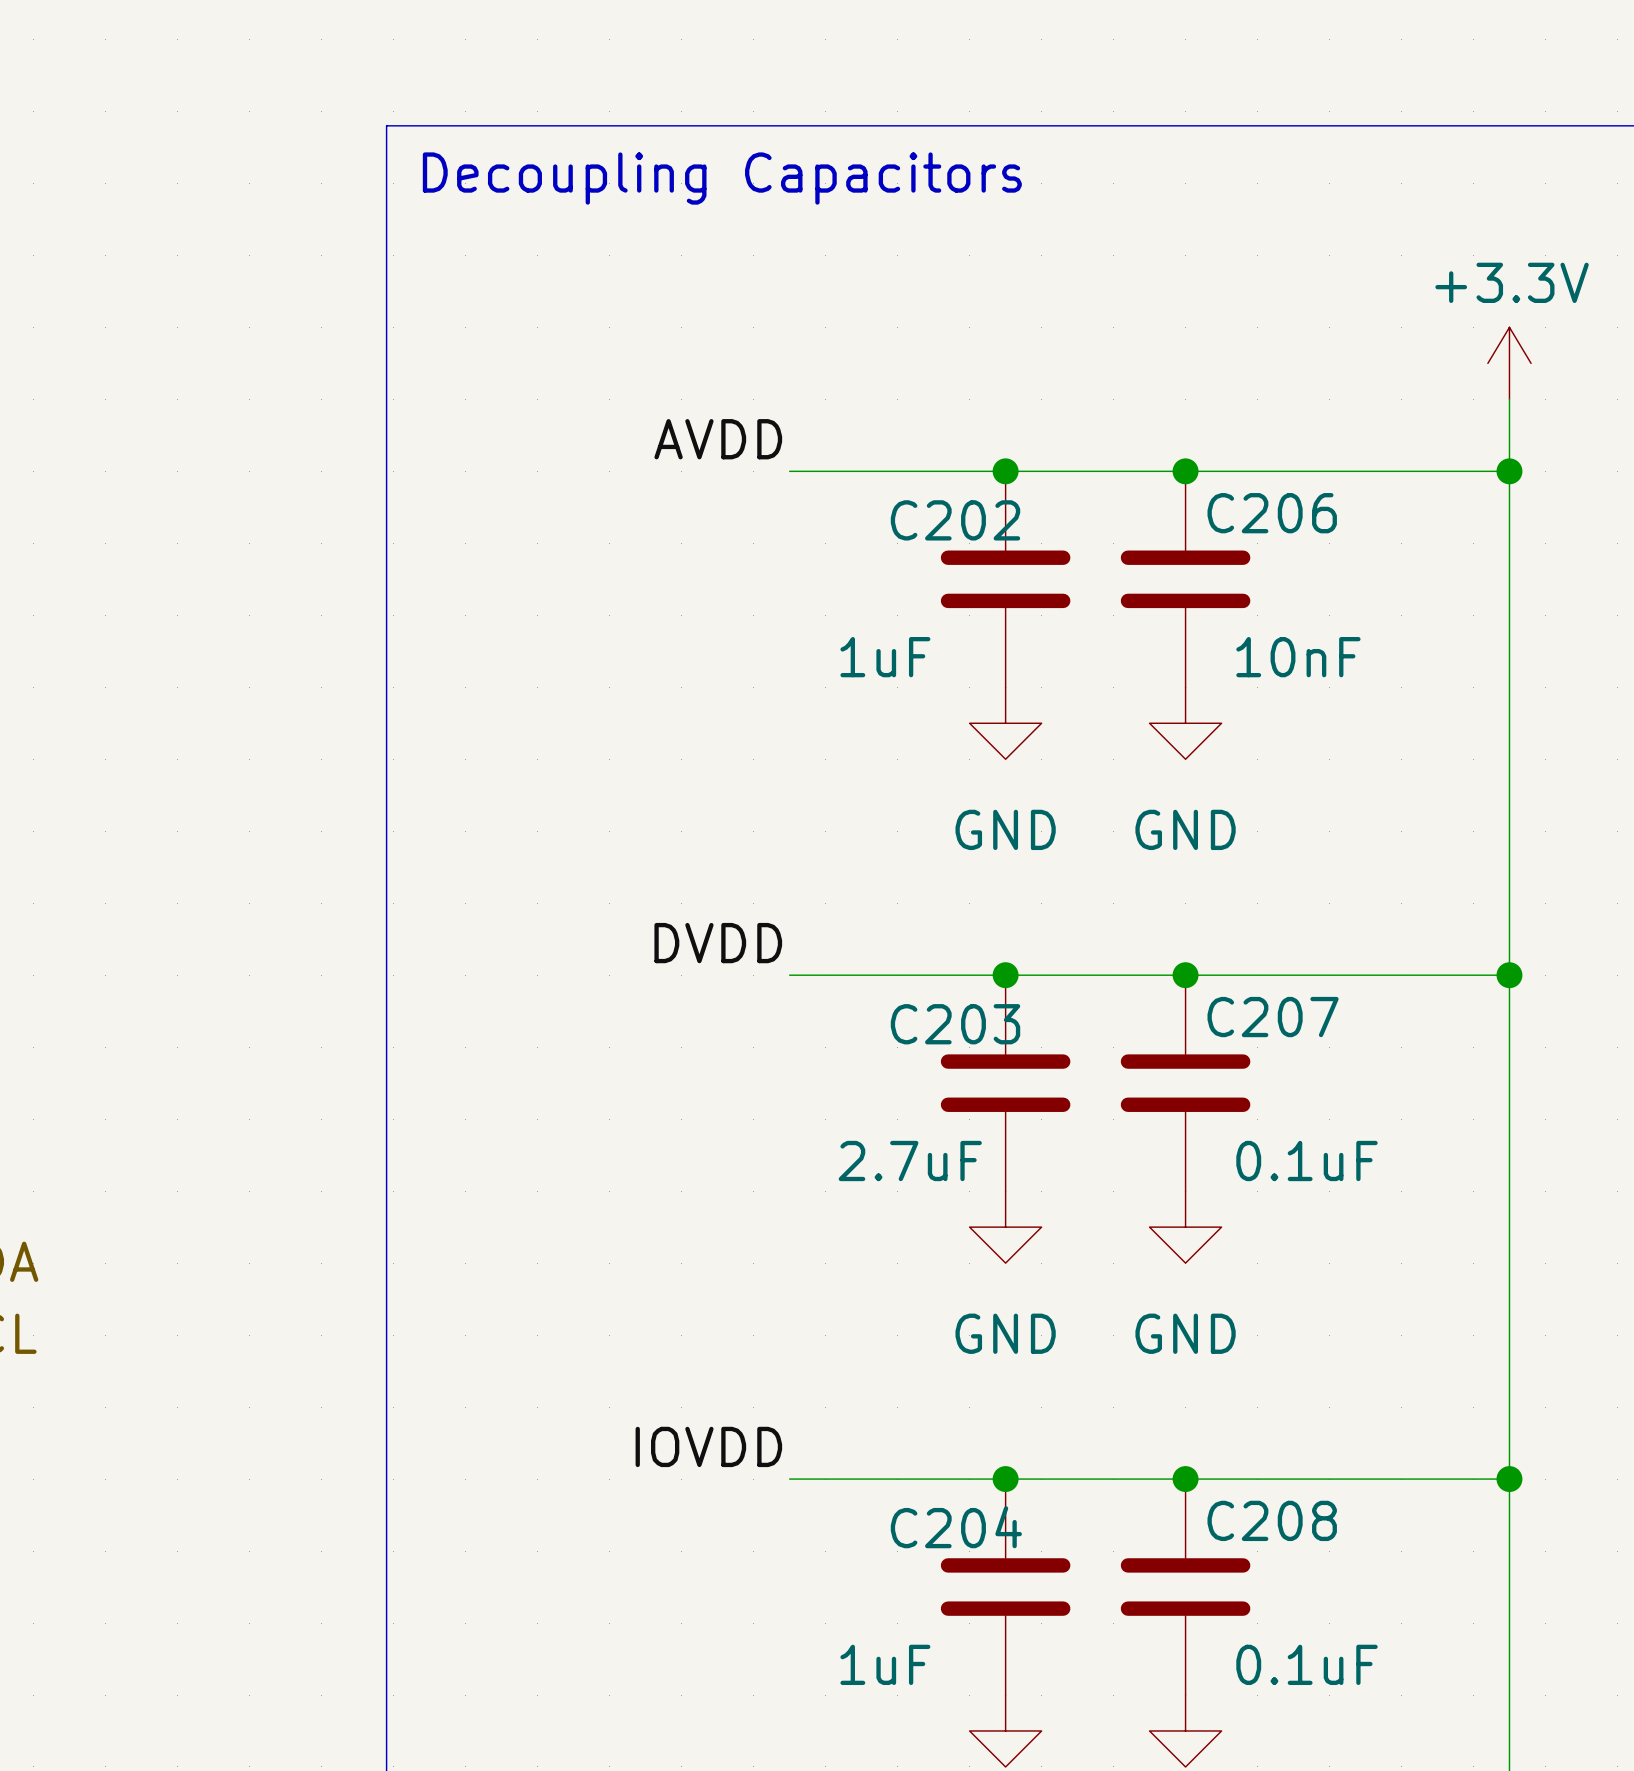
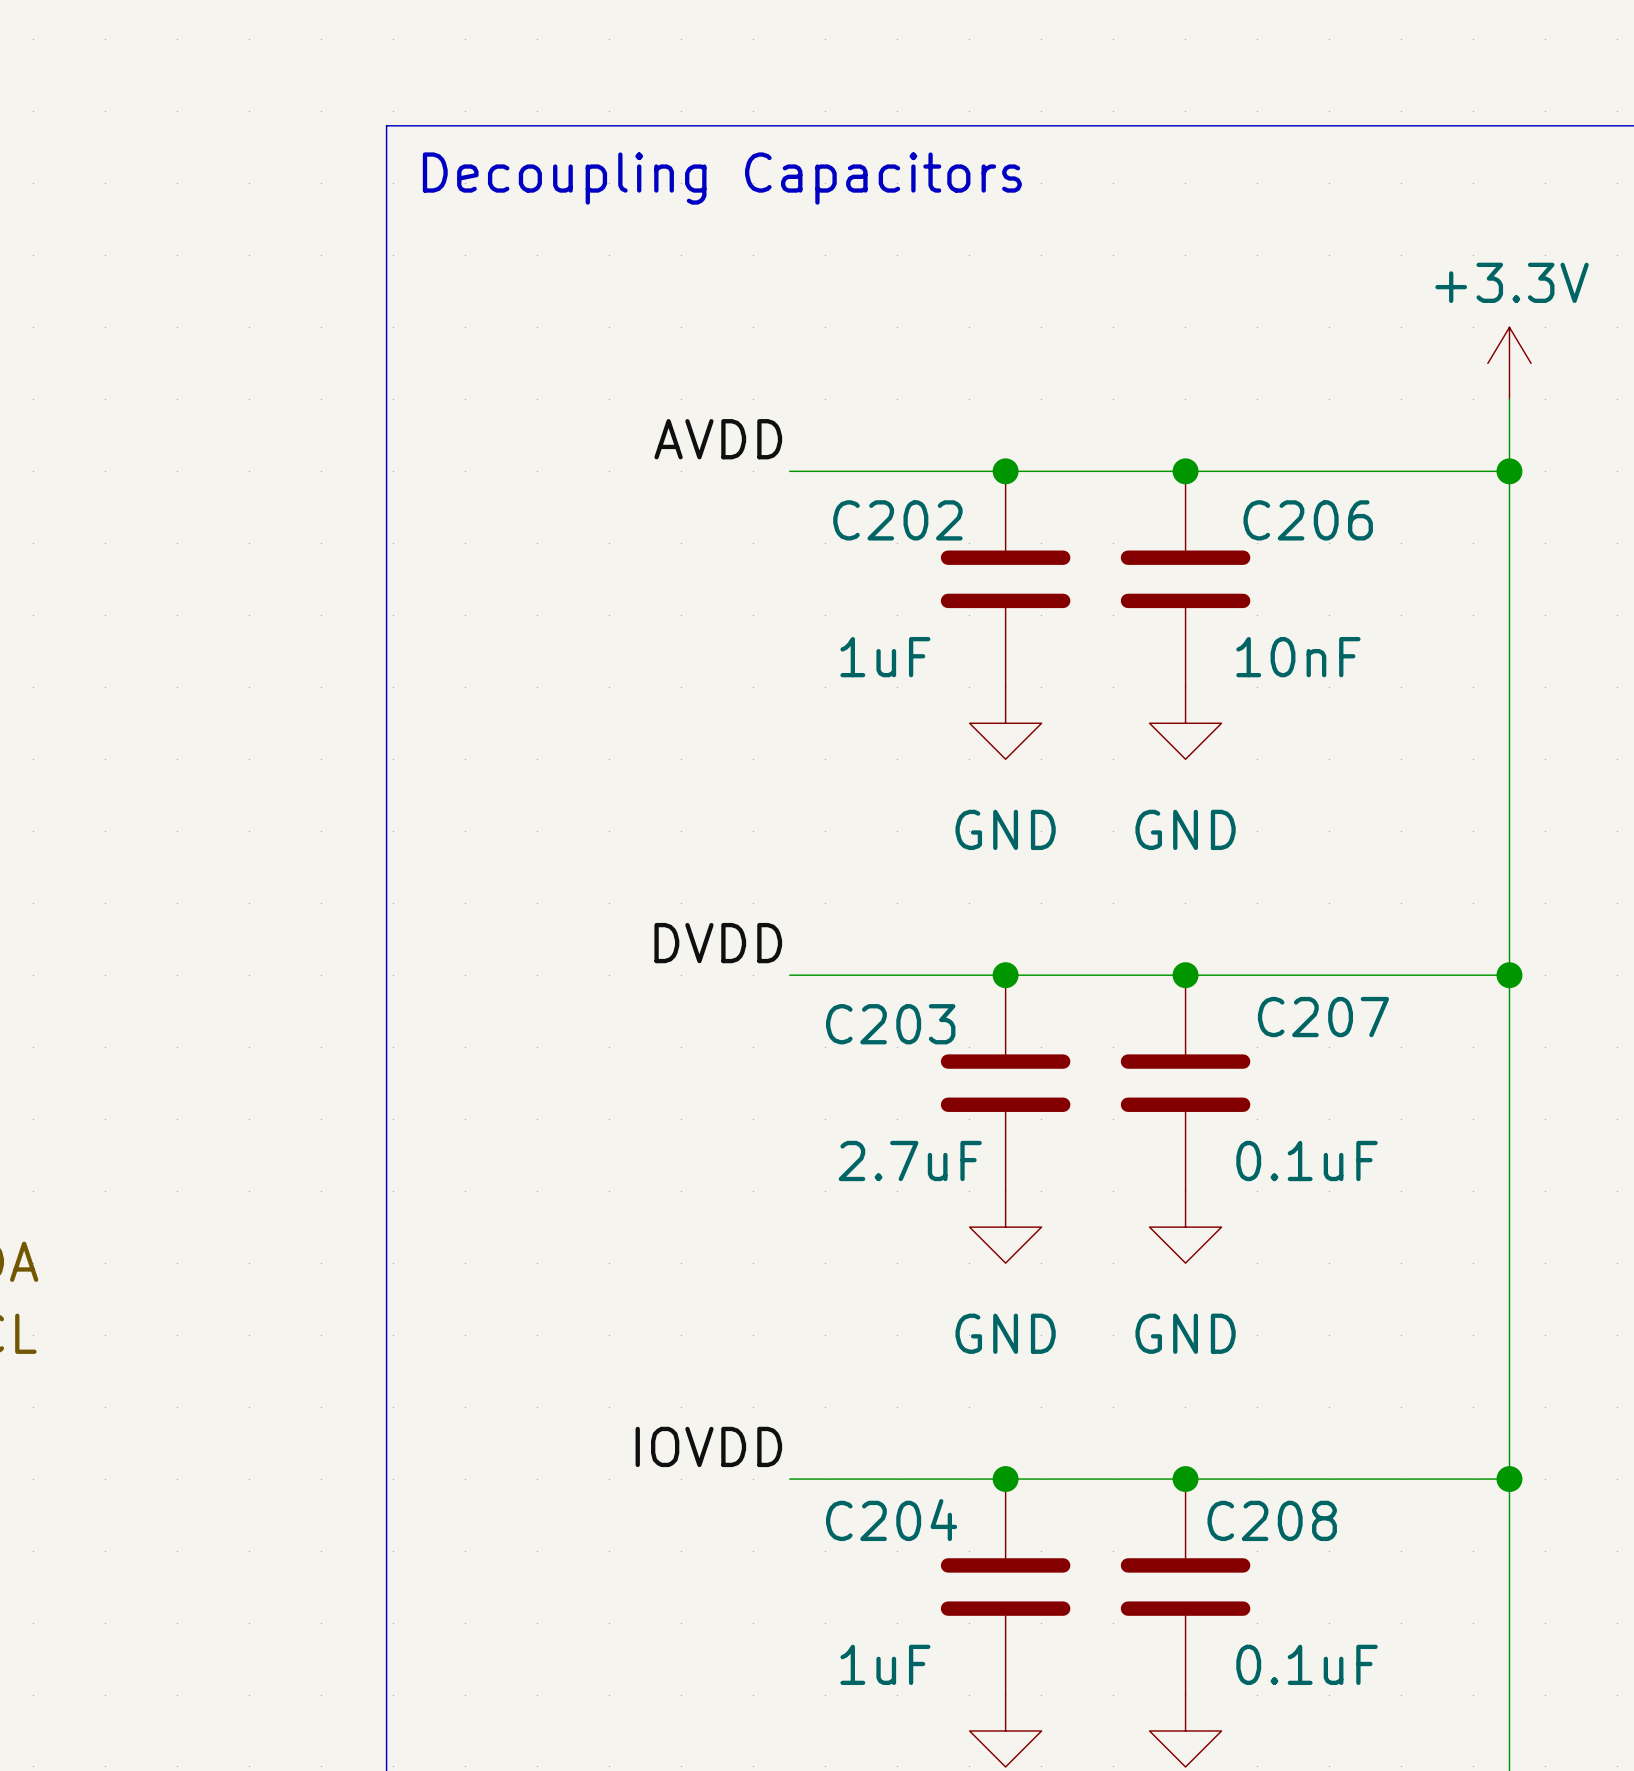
C206 name position: C206 (1272, 513) -> C206 (1308, 520)
C202 name position: C202 (955, 520) -> C202 (897, 520)
C207 name position: C207 (1273, 1017) -> C207 (1323, 1017)
C203 name position: C203 (955, 1024) -> C203 (890, 1024)
C204 name position: C204 (956, 1527) -> C204 (891, 1520)

